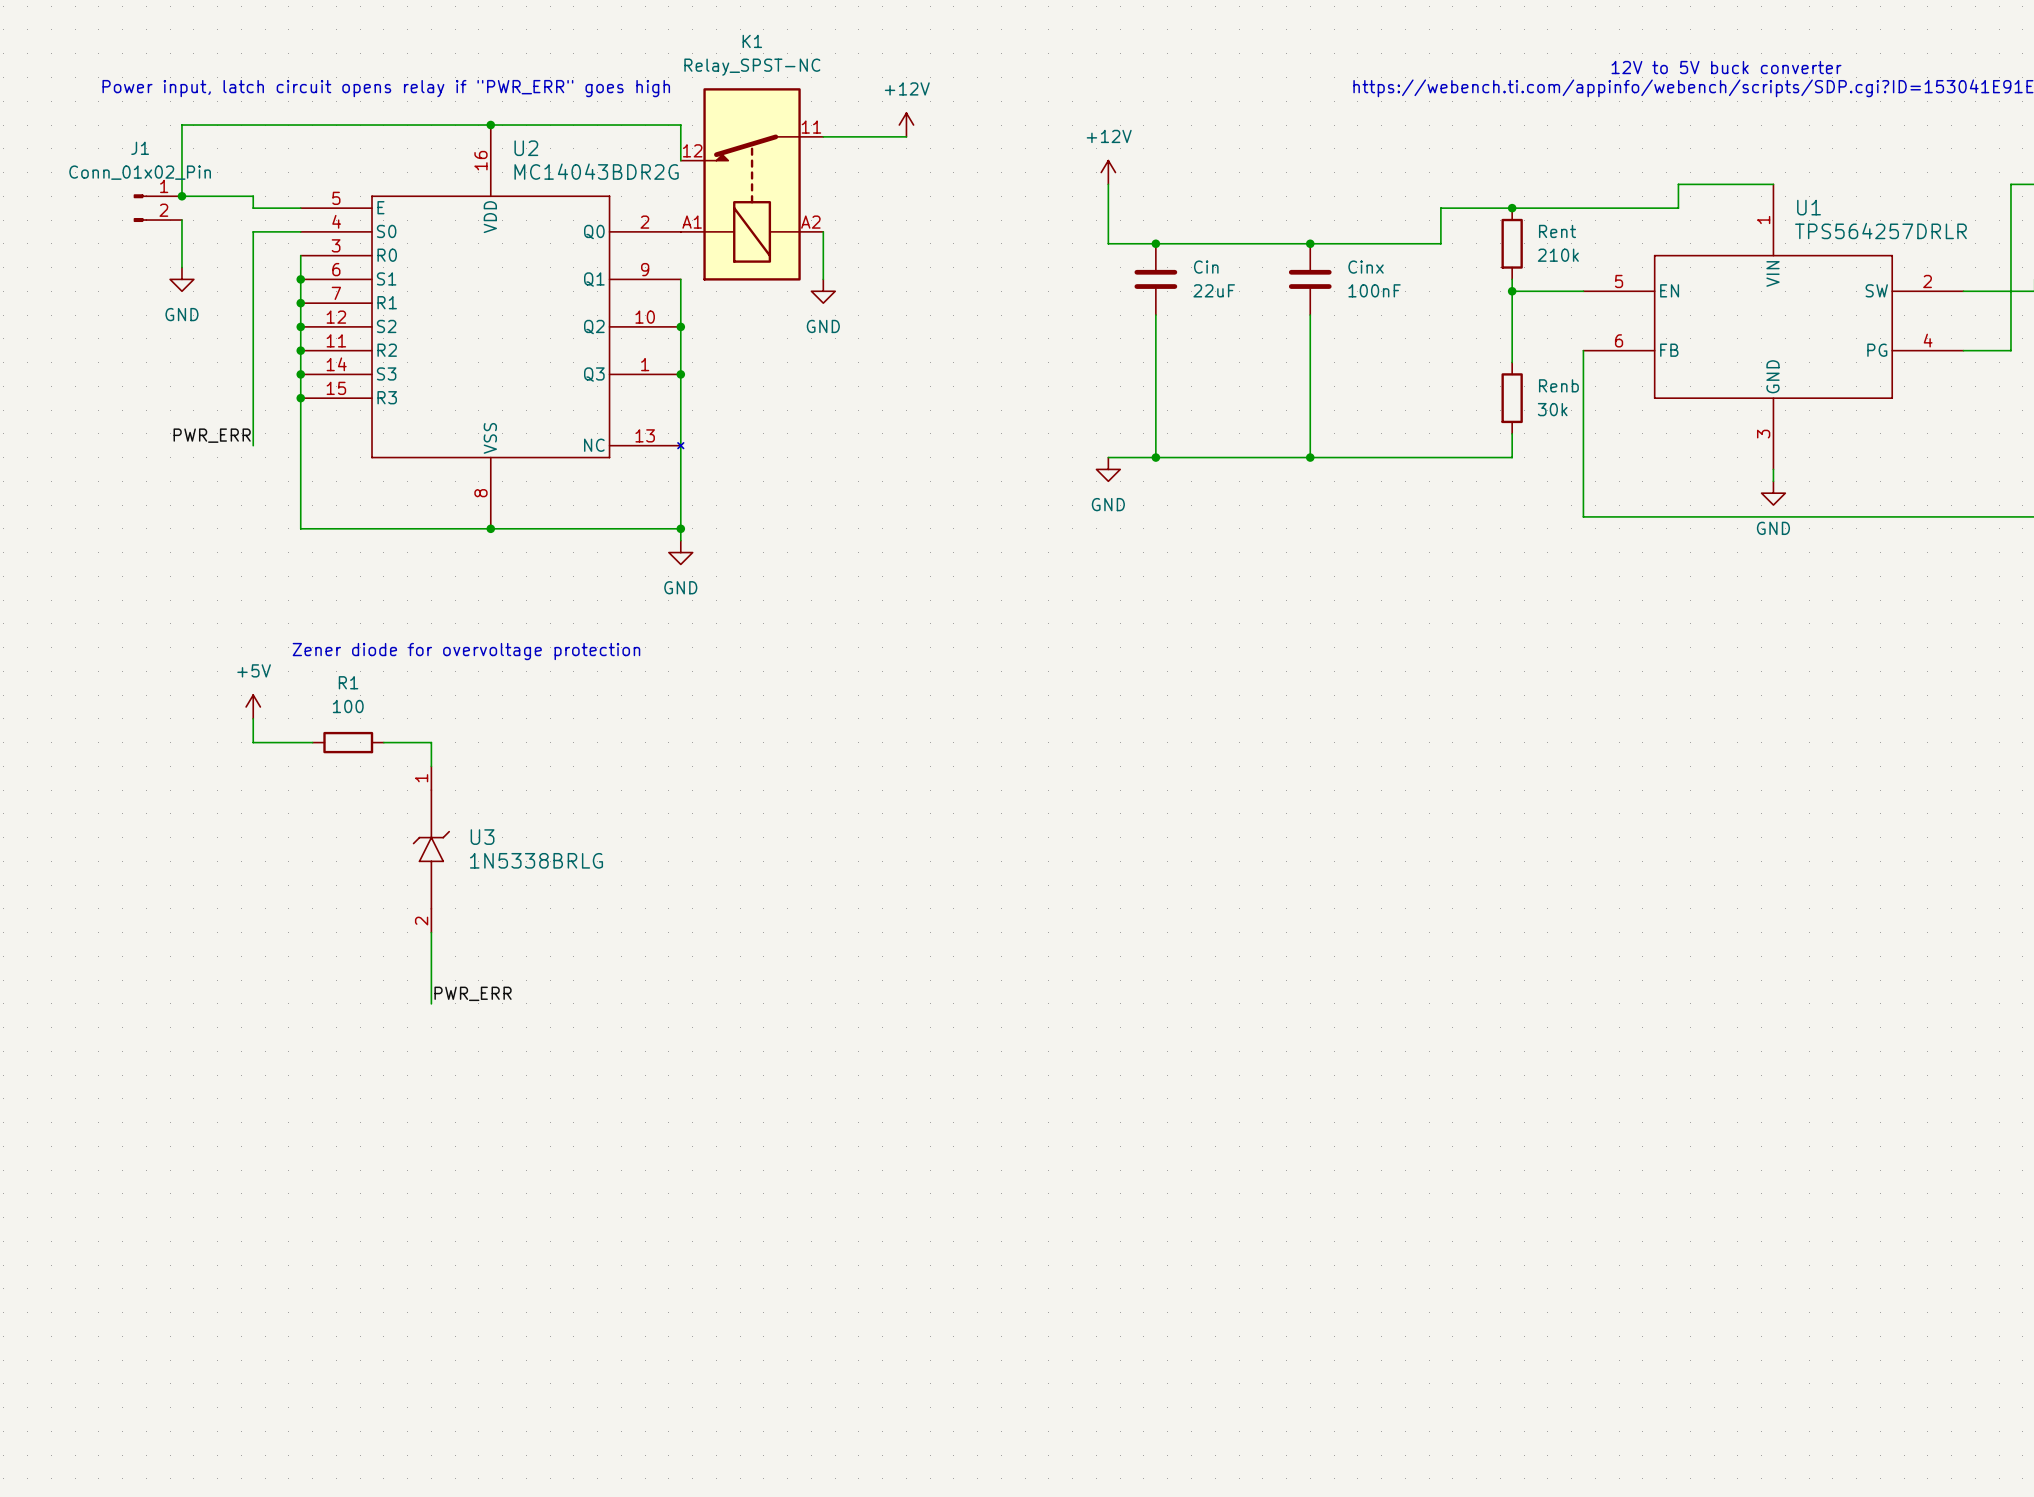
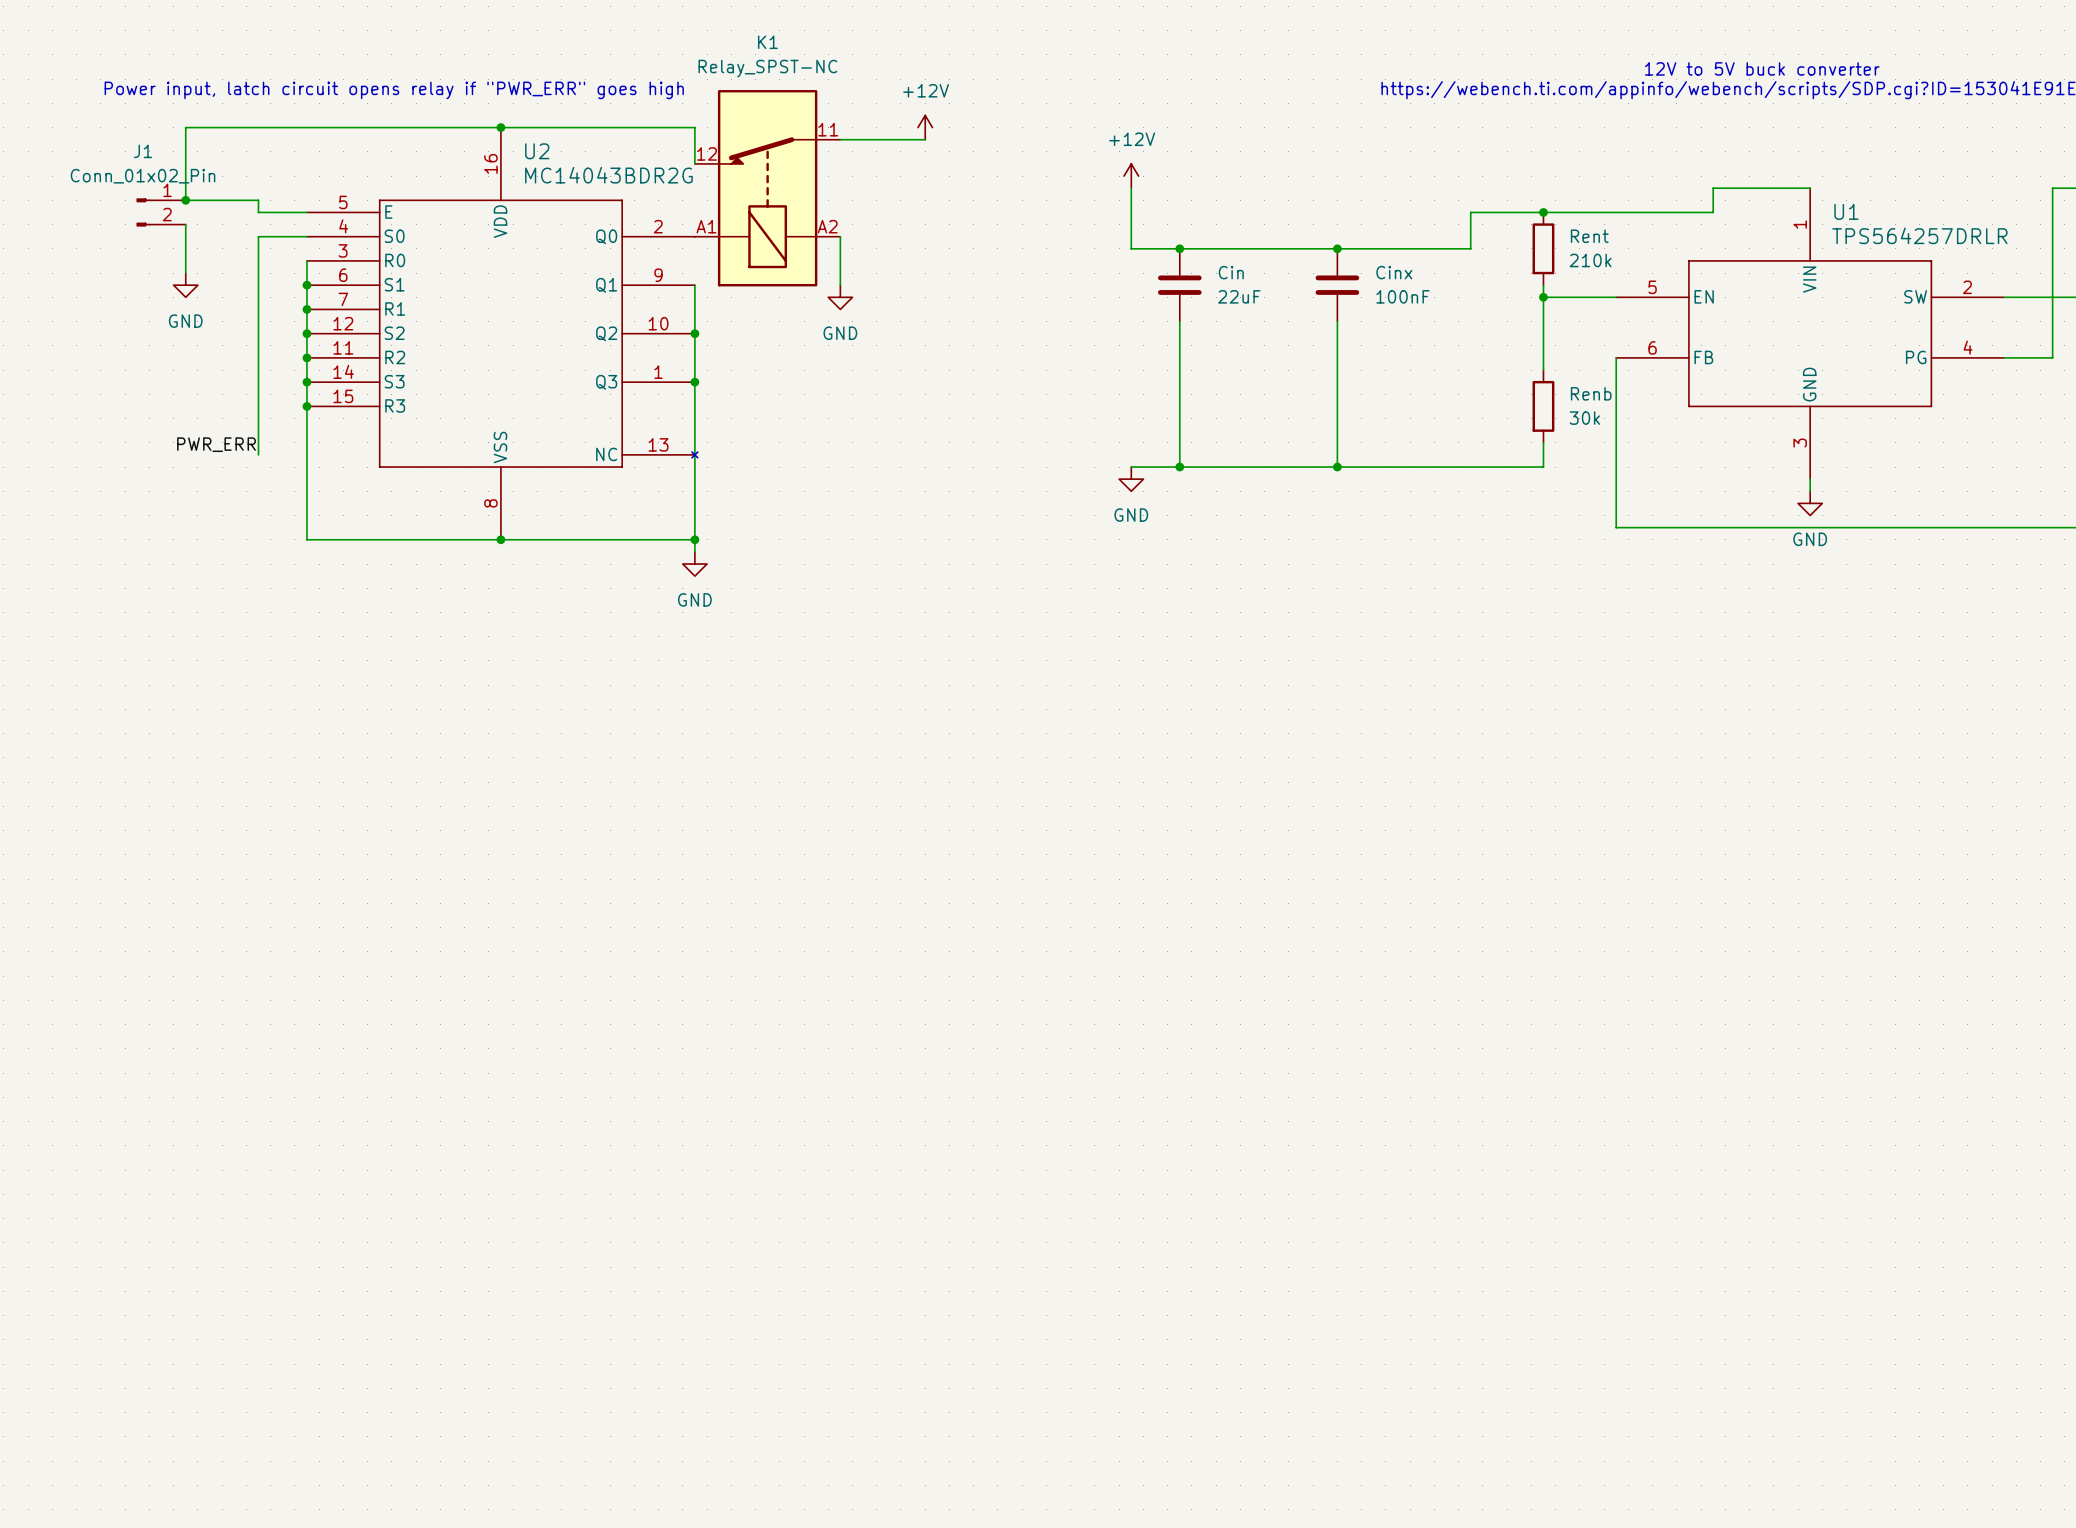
text: Zener diode for overvoltage protection (466, 651) -> none
power symbol: +5V (253, 706) -> none
wire: (253, 718) (253, 742) (312, 742) -> none
R1: 100 (348, 742) -> none
wire: (383, 742) (431, 742) (431, 766) -> none
U3: 1N5338BRLG (431, 849) -> none
wire: (431, 932) (431, 1003) -> none
label: PWR_ERR (473, 993) -> none

